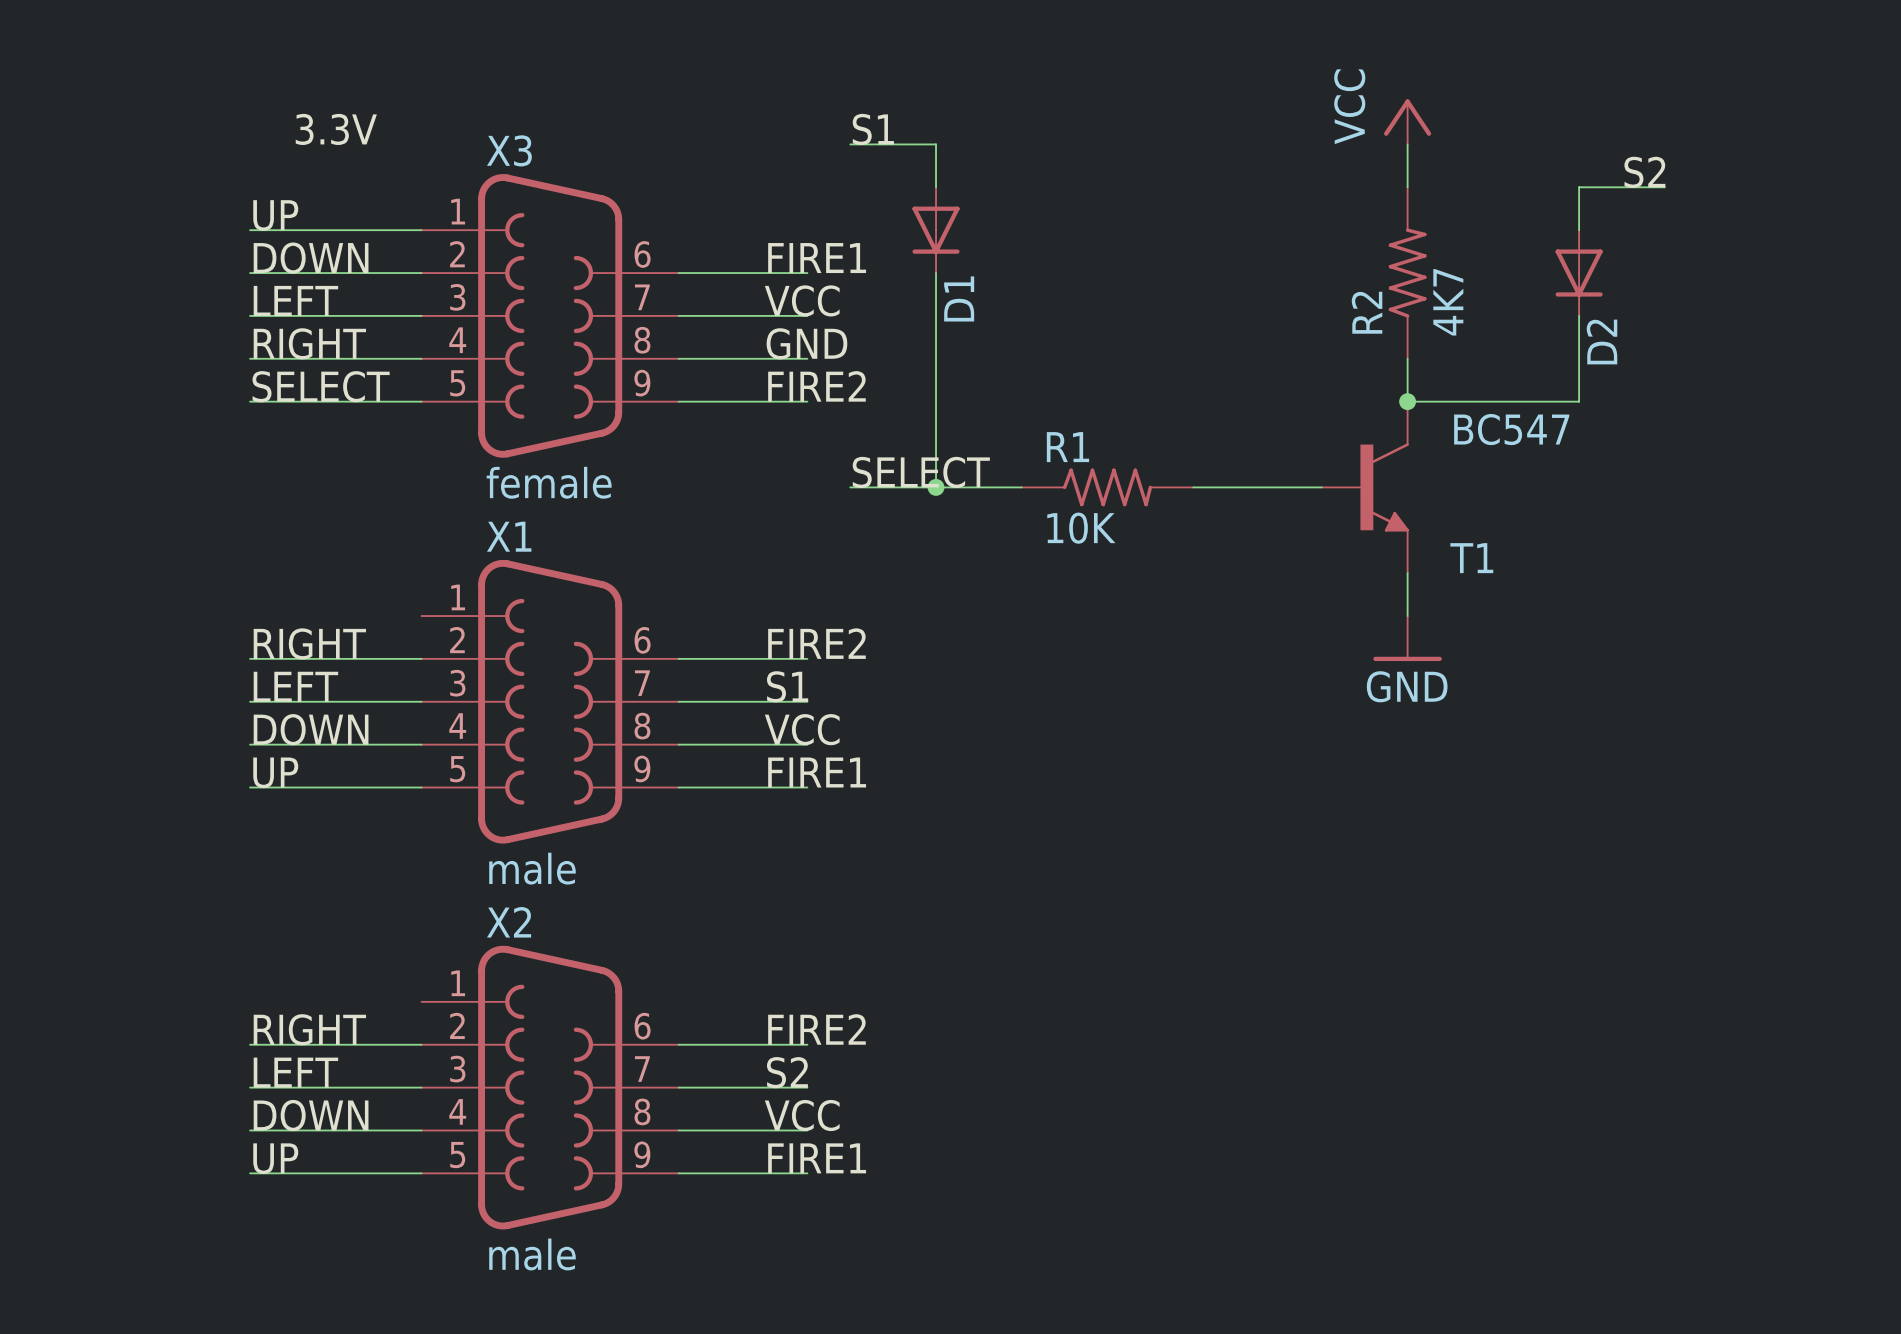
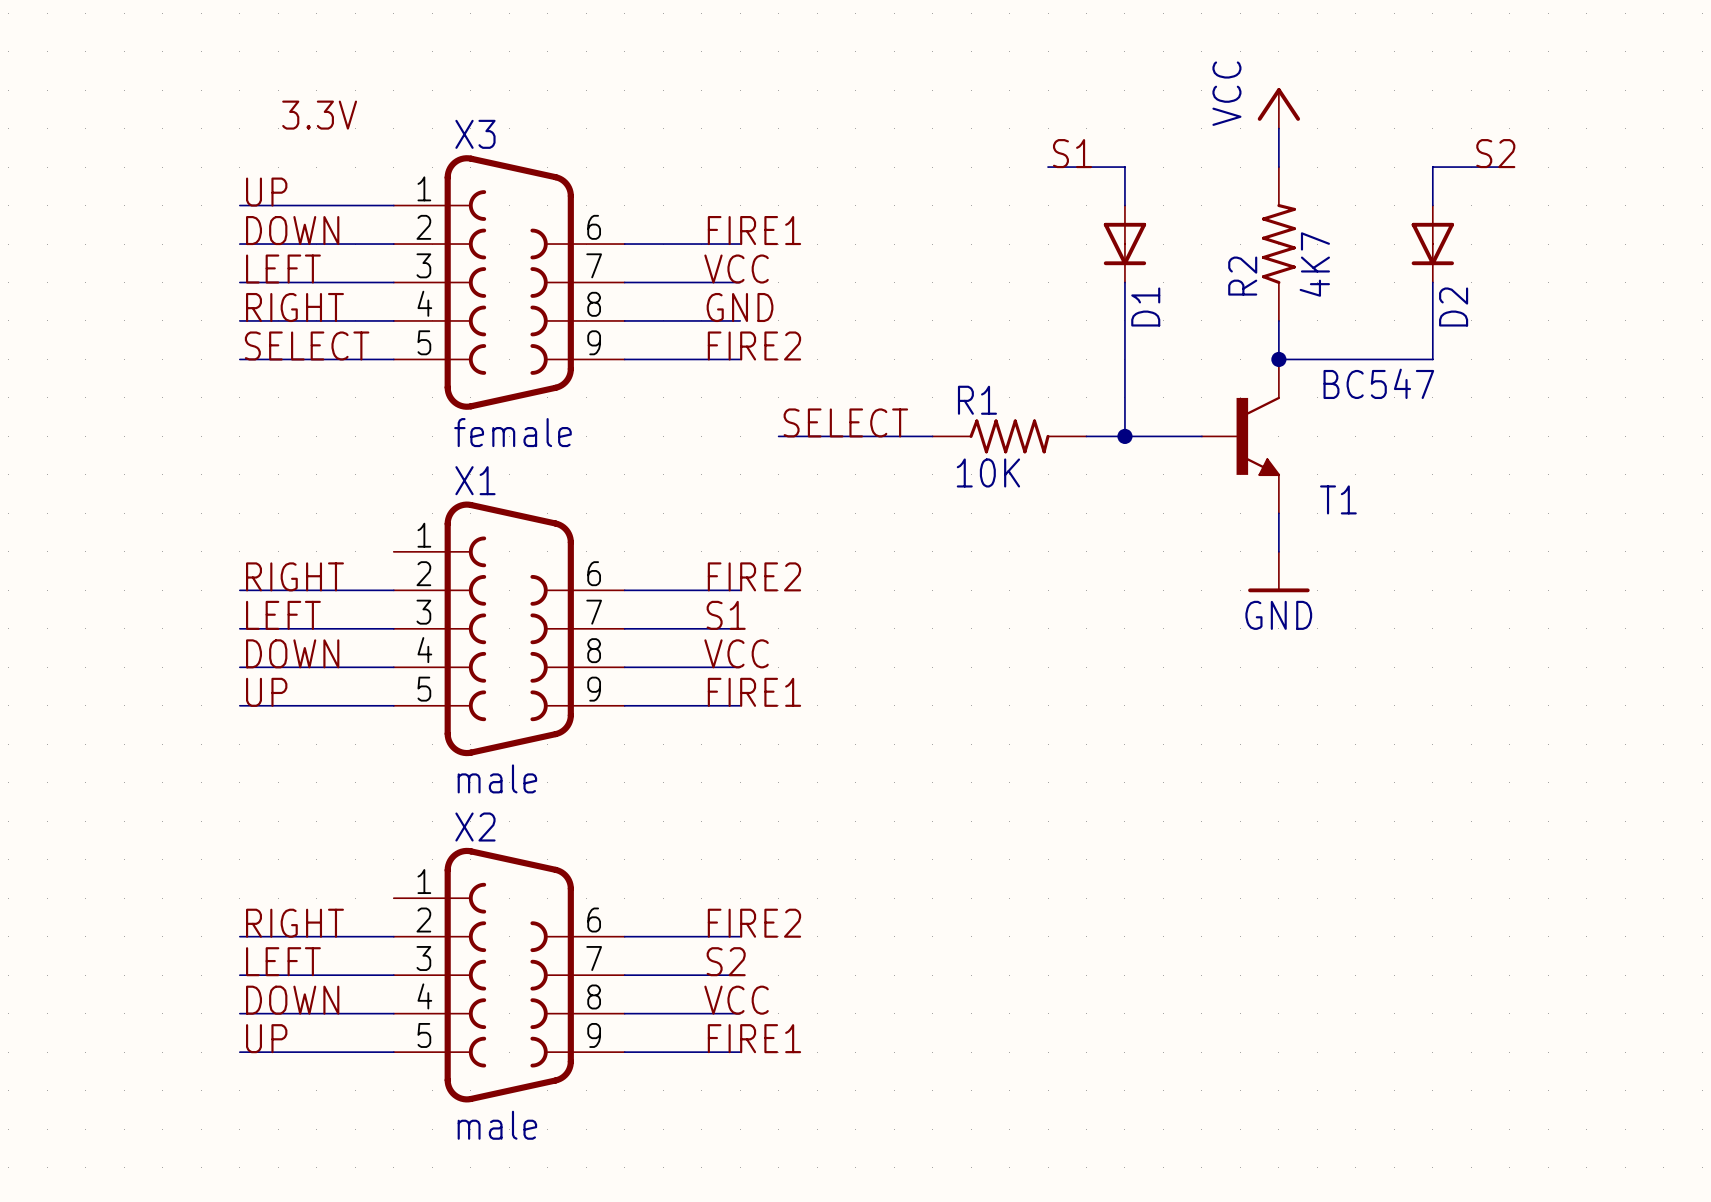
label position: S1 (873, 129) -> S1 (1072, 153)
wire: (850, 144) (936, 144) (936, 187) -> (1048, 167) (1124, 167) (1124, 205)
D1 position: (936, 230) -> (1124, 244)
wire: (936, 273) (936, 487) -> none
wire: none -> (1124, 282) (1124, 436)
junction: (936, 487) -> none
junction: none -> (1124, 436)

